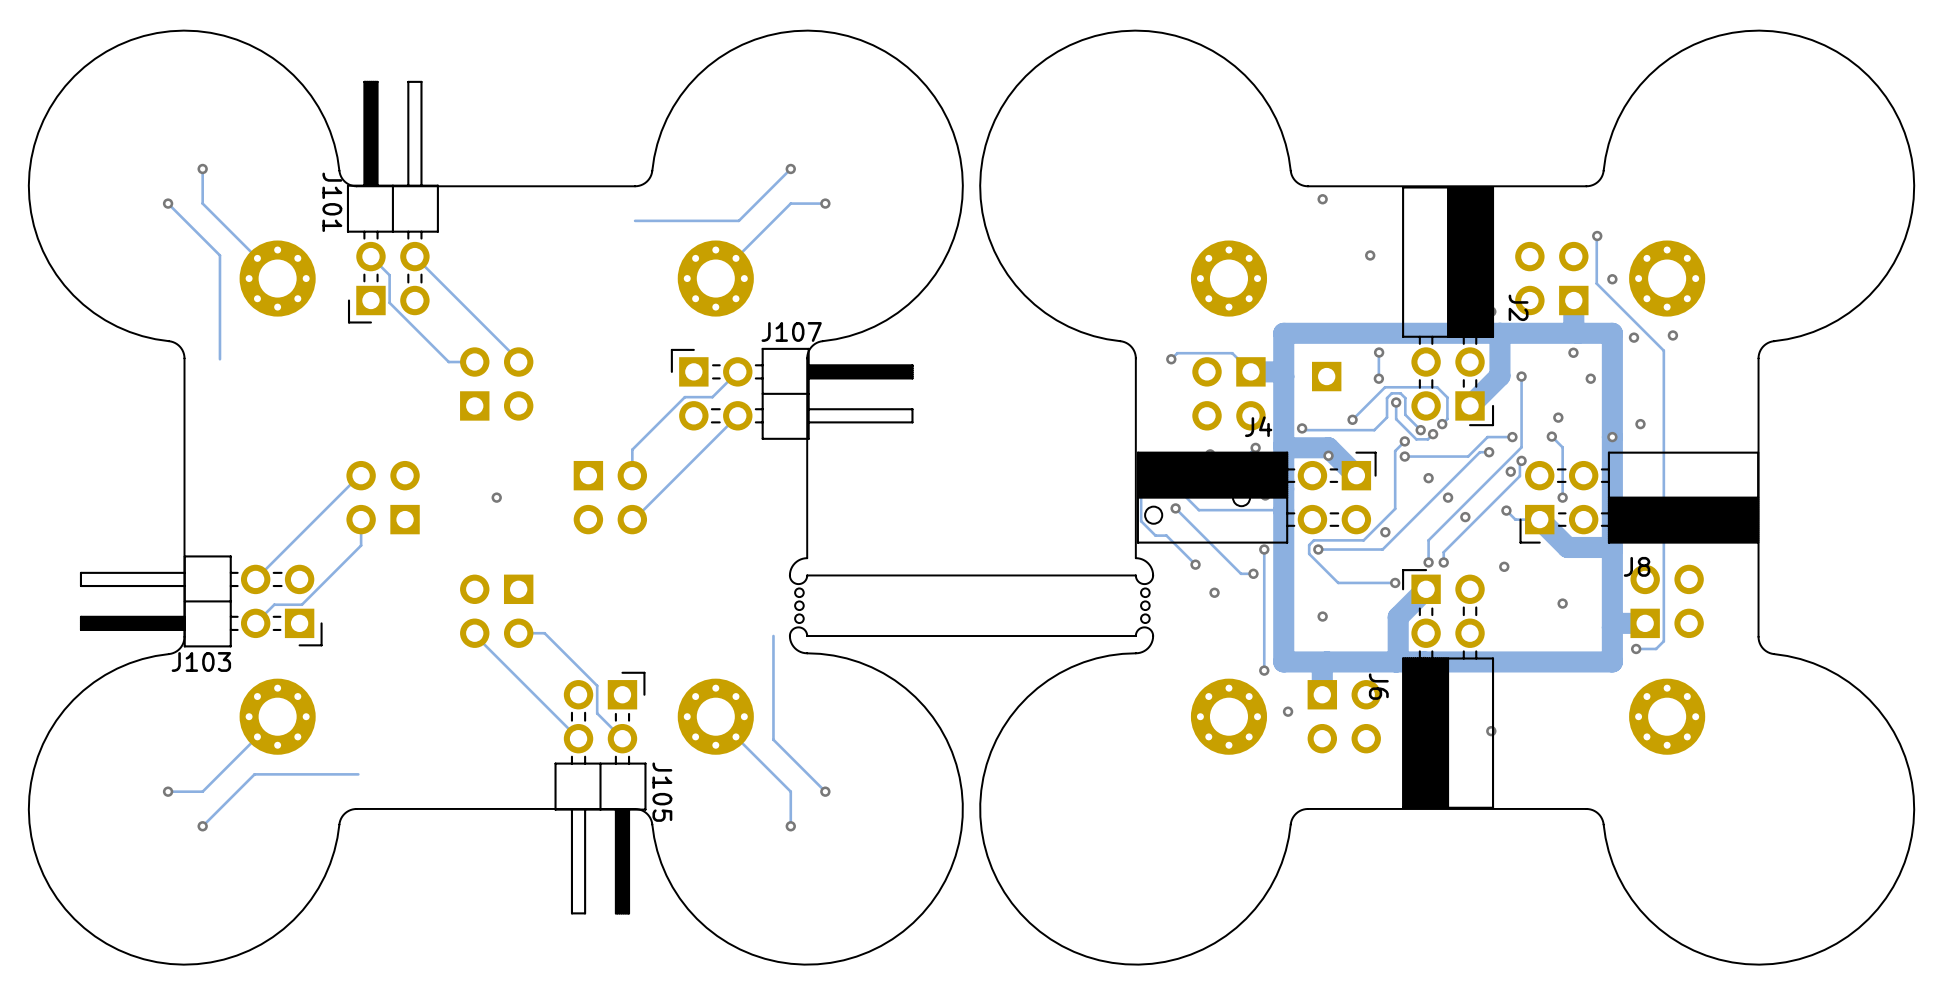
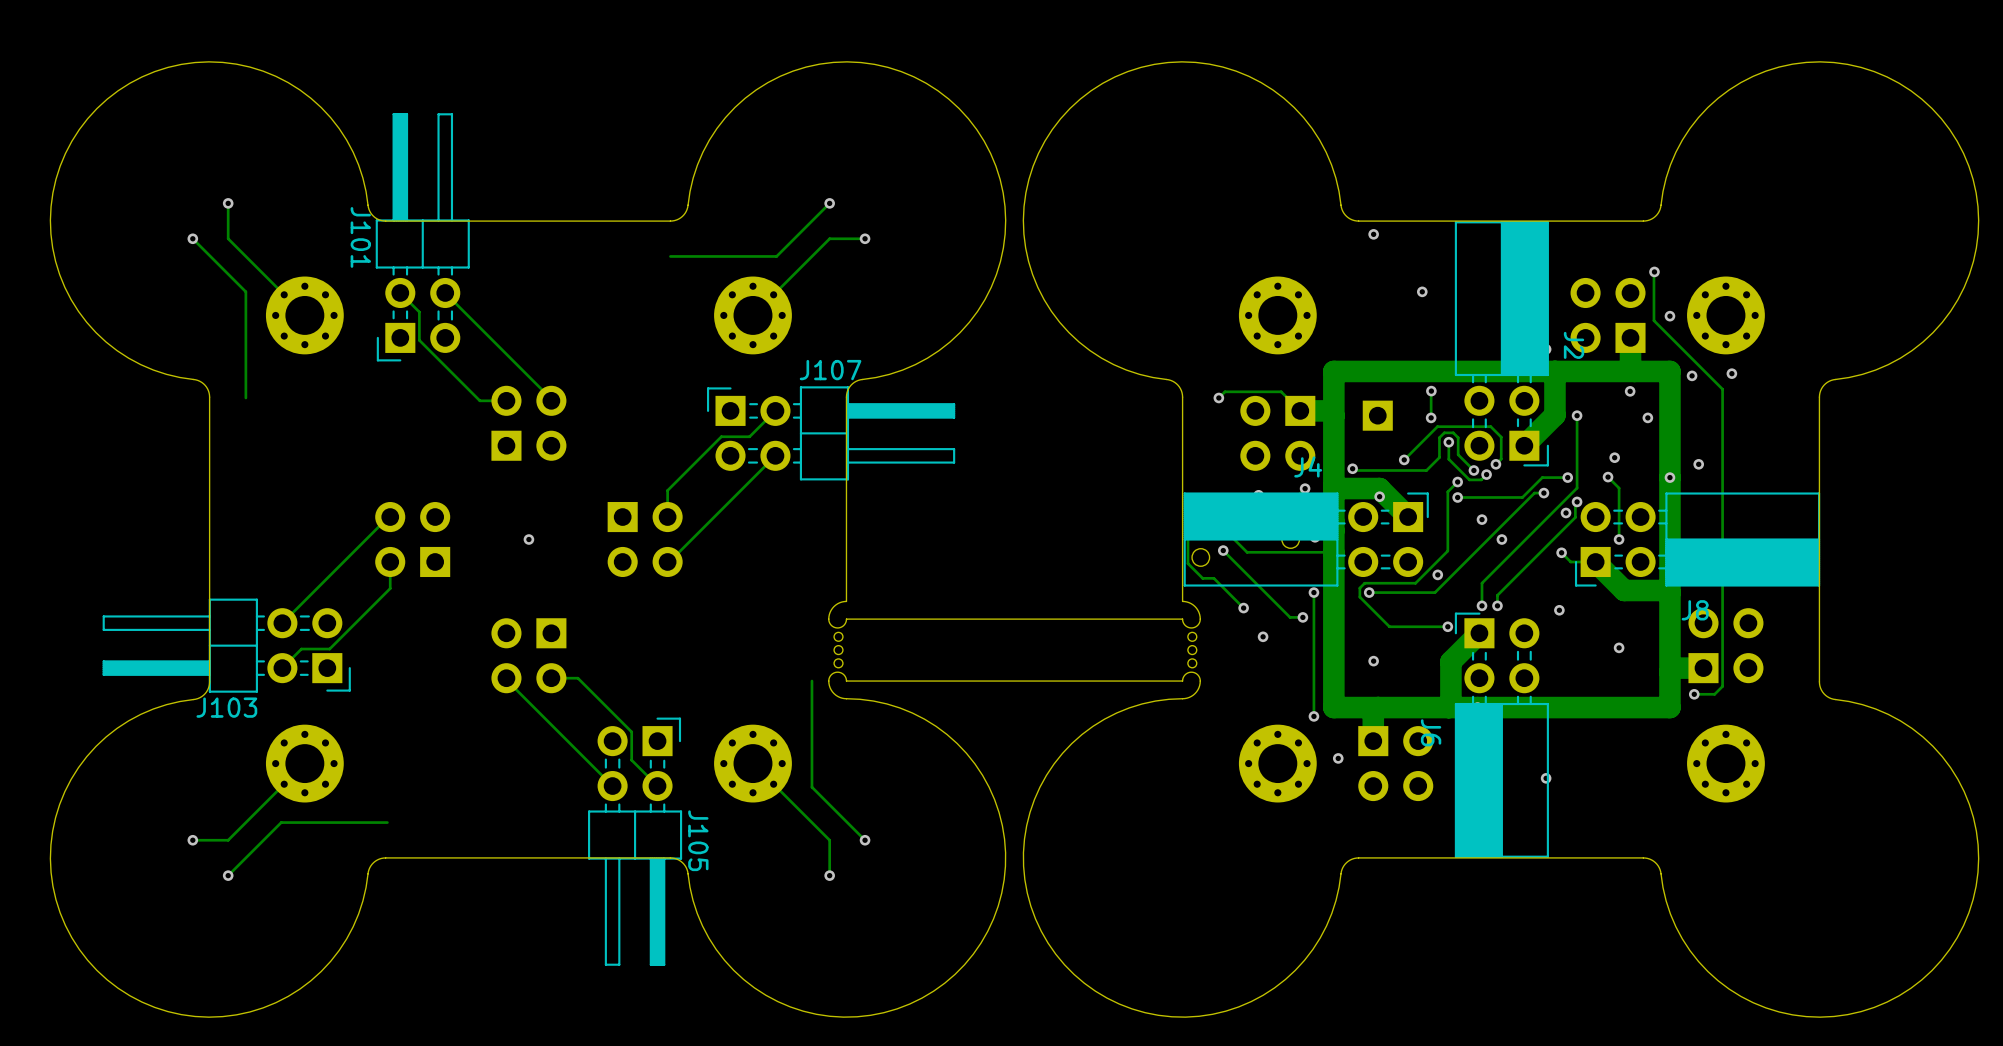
via: (1465, 517) -> none

